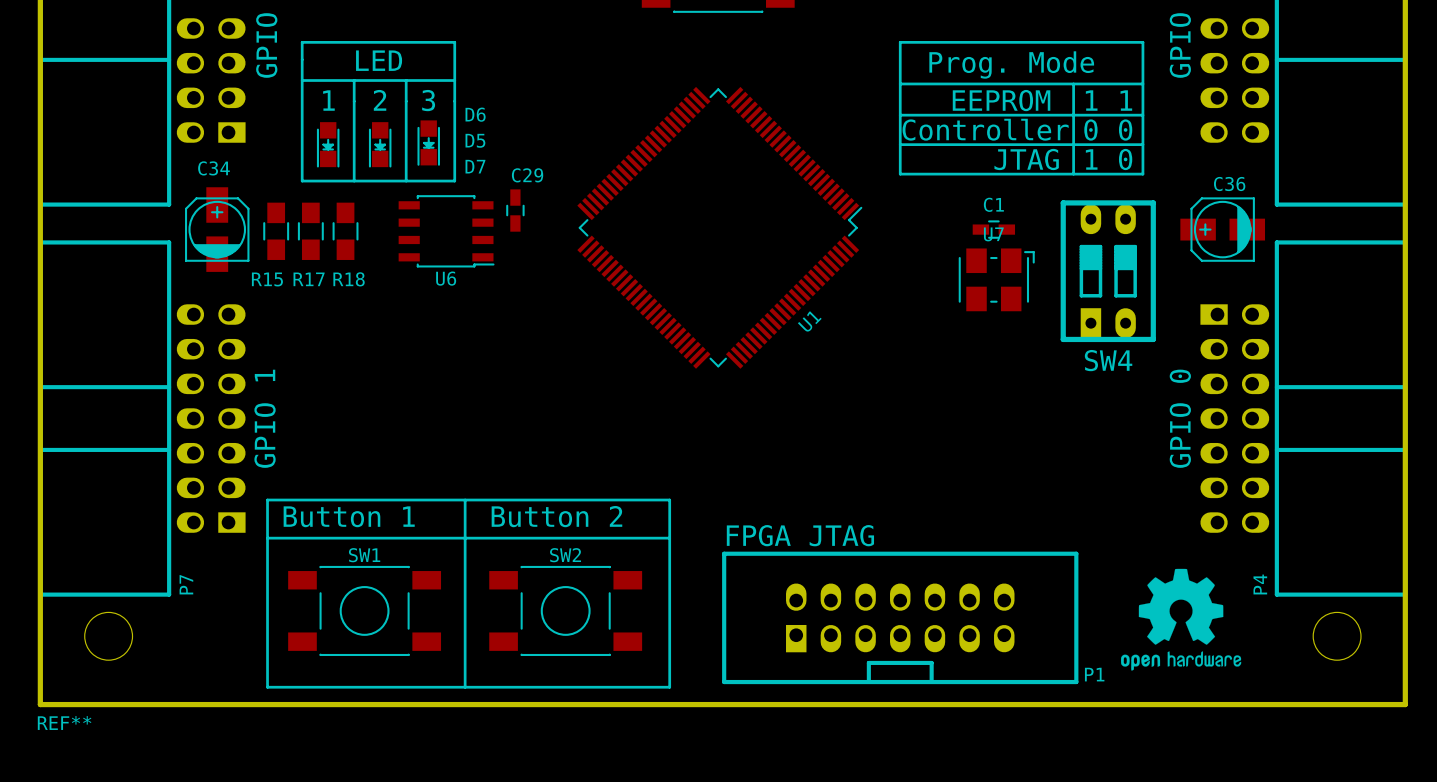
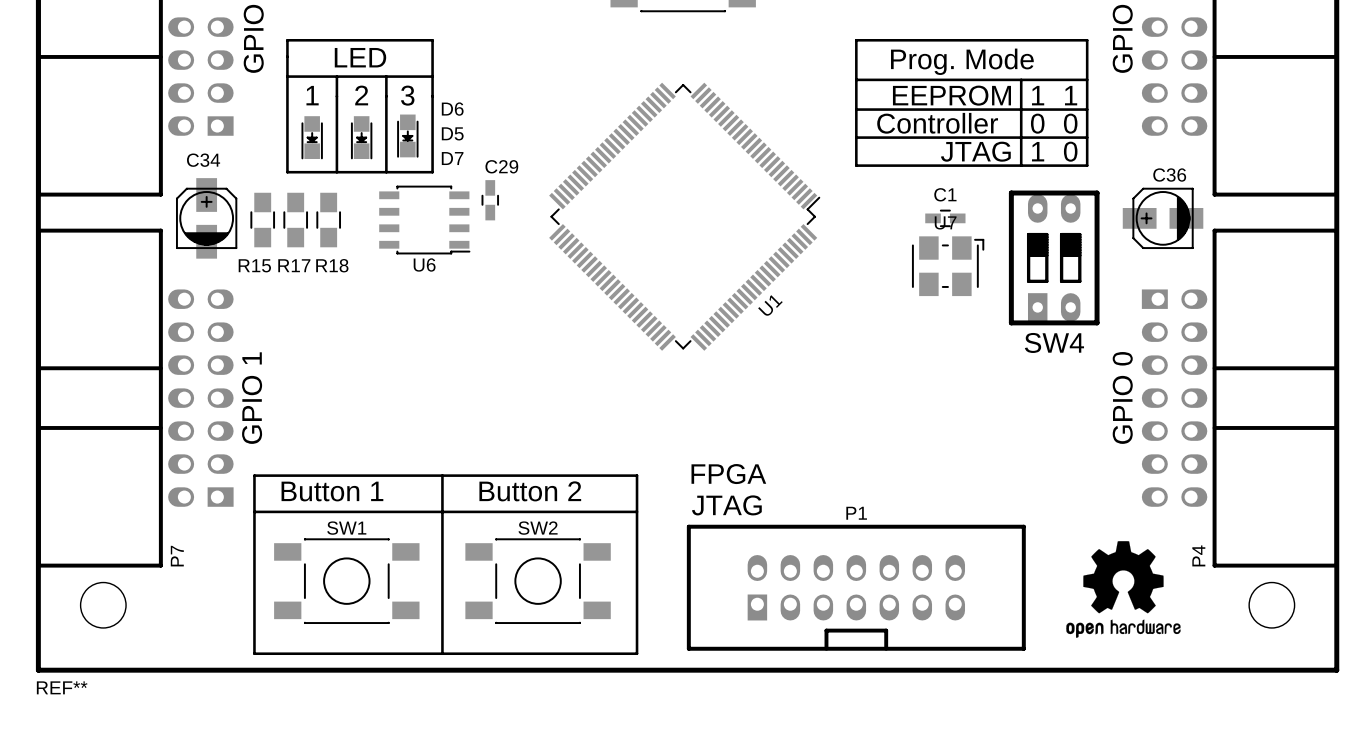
text: none -> FPGA (728, 474)
text: none -> JTAG (726, 505)
text: FPGA JTAG (800, 535) -> none
P1 name position: P1 (1094, 674) -> P1 (856, 513)

